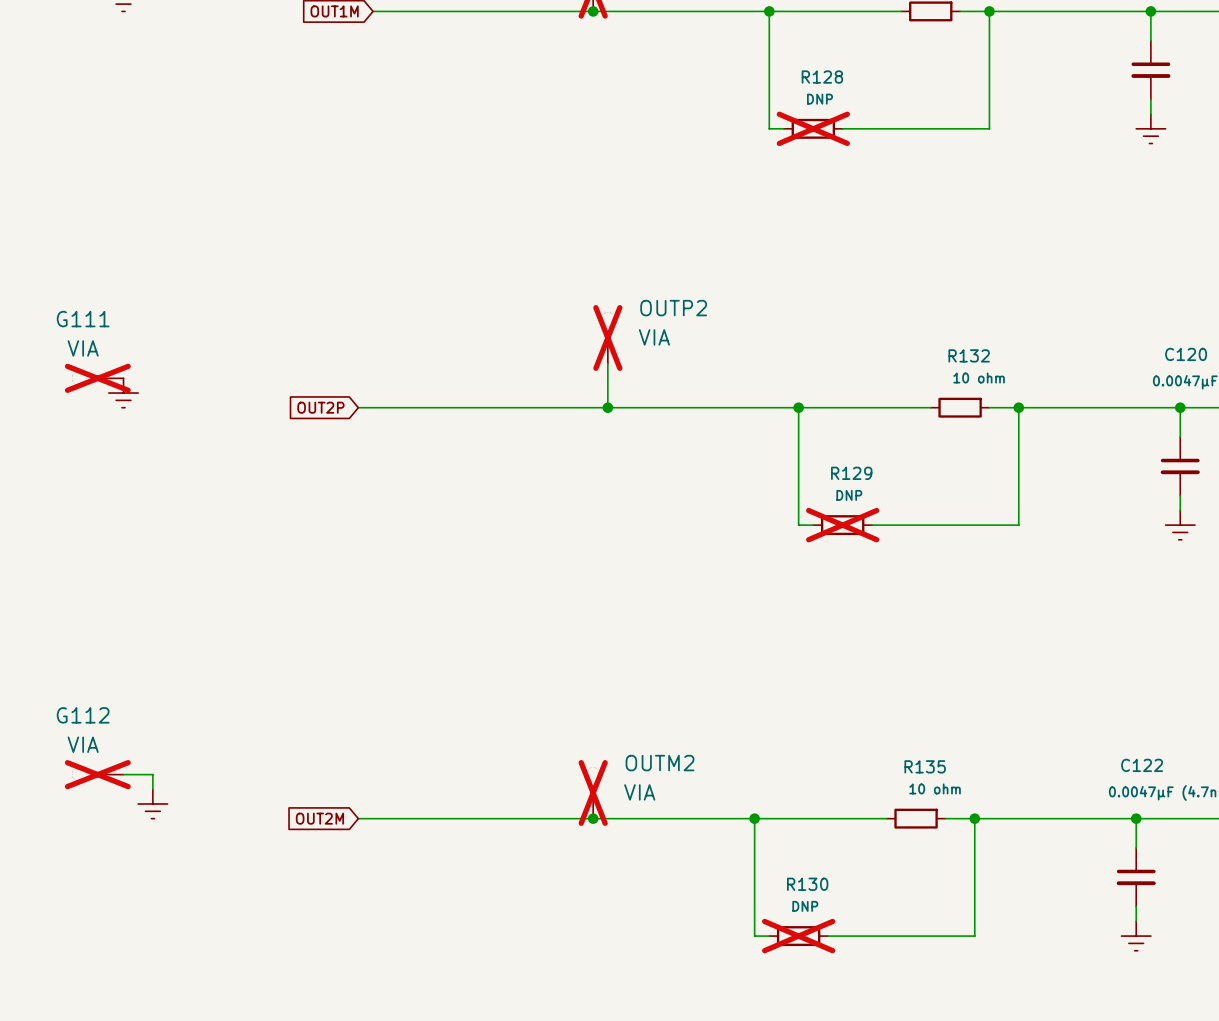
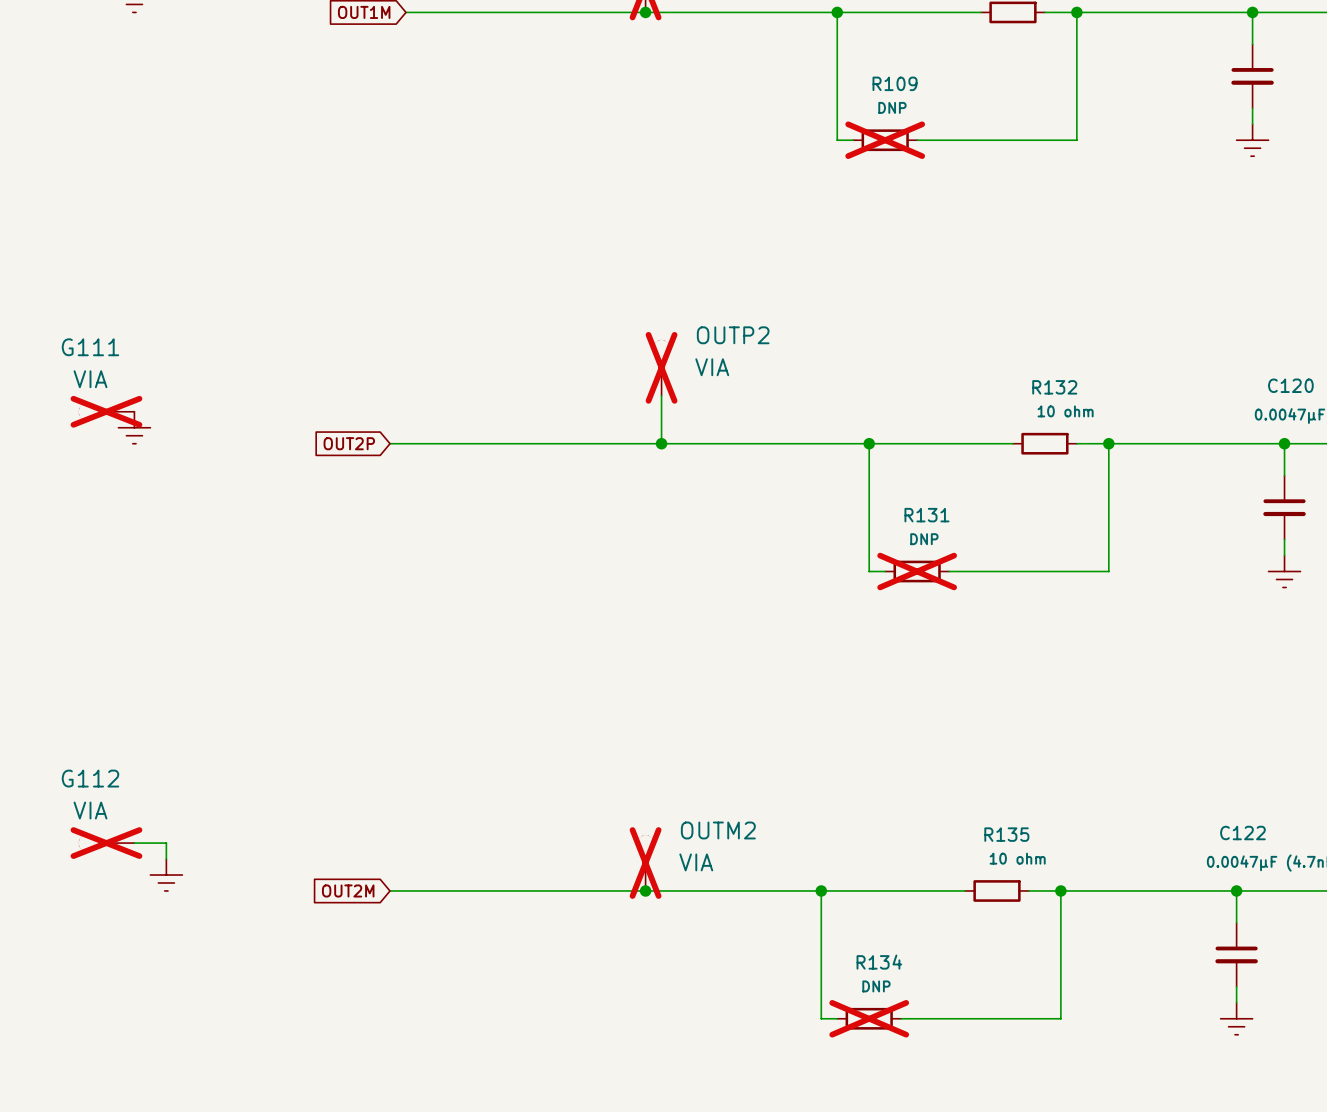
R128 name: R128 (822, 77) -> R109 (895, 83)
R129 name: R129 (851, 473) -> R131 (926, 515)
R130 name: R130 (807, 884) -> R134 (879, 962)

